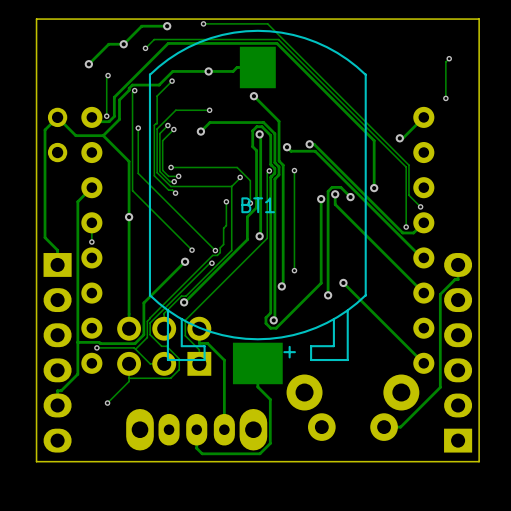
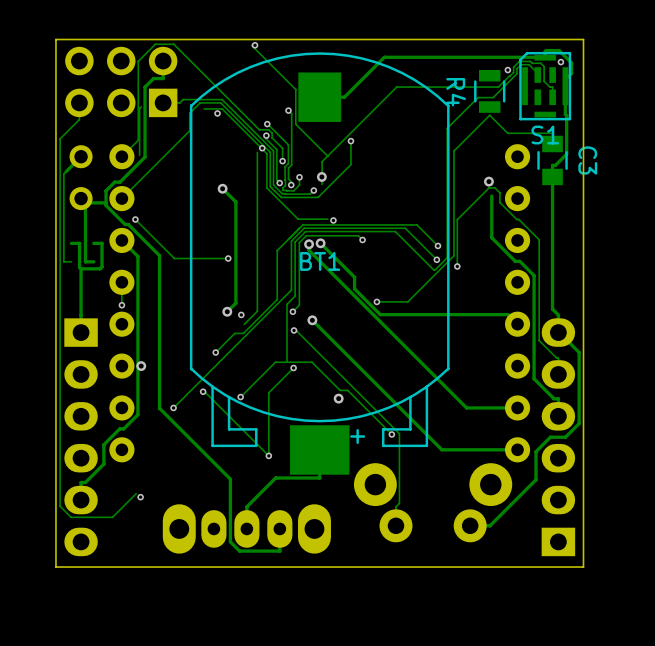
track: none -> (251, 45) (295, 89) (295, 124) (327, 156)
track: (203, 23) (267, 23) (408, 165) (408, 195) (420, 206) -> none
track: (167, 26) (141, 26) (123, 44) (108, 44) (88, 64) -> none
via: (167, 26) -> none
via: none -> (560, 62)
via: (123, 44) -> none
via: none -> (507, 70)
track: (145, 48) (154, 39) (278, 39) (406, 167) (406, 227) -> none
via: (145, 48) -> none
track: none -> (537, 75) (529, 64) (521, 64) (516, 68) (516, 73) (493, 97) (478, 97) (447, 128) (447, 257) (434, 270) (395, 231) (305, 231) (295, 242) (295, 296) (287, 304) (287, 362)
S1: none -> (545, 86)
track: (449, 58) (445, 62) (445, 98) -> none
via: (449, 58) -> none
R4: none -> (489, 91)
via: (88, 64) -> none
track: (257, 67) (237, 67) (233, 71) (172, 71) (159, 85) (132, 85) (119, 99) (119, 119) (103, 135) -> (319, 97) (344, 97) (384, 57) (545, 57) (546, 50) (559, 50) (571, 63) (571, 73) (565, 79) (566, 154) (555, 165) (552, 165) (552, 309) (558, 315) (558, 332)
track: none -> (552, 97) (552, 86) (549, 86) (544, 81) (544, 66) (540, 63) (530, 61) (519, 61) (513, 67) (513, 72) (498, 87) (396, 87) (322, 161) (322, 184)
via: (208, 71) -> none
track: none -> (79, 102) (79, 119) (60, 138) (60, 506) (71, 517) (112, 517) (136, 493)
track: none -> (163, 102) (179, 102) (183, 99) (222, 99) (273, 150) (273, 185) (282, 193) (310, 194) (313, 190)
via: (108, 75) -> none
track: none -> (204, 108) (222, 108) (266, 153) (266, 187) (298, 219) (327, 219)
track: none -> (288, 110) (291, 113) (291, 164) (288, 168) (288, 179) (291, 185)
via: none -> (288, 110)
track: (172, 81) (157, 96) (157, 123) (154, 125) (154, 175) (168, 190) (172, 190) (175, 193) -> none
track: (134, 90) (132, 92) (132, 190) (192, 250) -> none
via: (134, 90) -> none
track: none -> (267, 124) (288, 144) (288, 163) (285, 166) (285, 185) (283, 189) (293, 190) (299, 185) (299, 177)
via: none -> (267, 124)
track: (253, 96) (279, 121) (279, 161) (283, 165) (281, 286) -> none
via: (253, 96) -> none
via: (445, 98) -> none
track: none -> (266, 135) (266, 139) (276, 149) (276, 180) (279, 183)
via: none -> (266, 135)
track: none -> (350, 141) (350, 164) (318, 197) (281, 197) (275, 191)
via: none -> (350, 141)
track: none -> (552, 143) (552, 133) (507, 133) (489, 115) (454, 151) (454, 255) (407, 301) (376, 301)
track: (209, 110) (175, 110) (157, 128) (157, 172) (170, 186) (231, 186) (231, 250) (186, 296) (181, 296) (164, 313) (164, 328) -> none
track: none -> (257, 152) (257, 311) (244, 324)
via: (106, 116) -> none
track: (57, 117) (75, 135) (103, 135) -> none
track: (91, 117) (96, 121) (109, 121) (114, 116) (114, 97) (168, 43) (276, 43) (374, 140) (374, 188) -> (121, 156) (138, 140) (138, 61) (155, 44) (173, 44) (259, 129) (268, 129) (272, 133) (272, 137) (282, 148) (282, 161)
track: (423, 117) (402, 138) (399, 138) -> none
C3: none -> (552, 160)
via: none -> (282, 161)
track: (167, 125) (159, 133) (159, 171) (170, 181) (174, 181) -> none
via: (167, 125) -> none
track: (138, 128) (138, 173) (215, 250) -> none
via: (138, 128) -> none
track: (45, 129) (45, 237) (57, 250) -> (66, 171) (63, 173) (63, 261) (71, 261)
track: (173, 129) (162, 140) (162, 170) (168, 176) (178, 176) -> none
via: (173, 129) -> none
track: (200, 131) (209, 122) (263, 122) (274, 133) (274, 162) (279, 166) (279, 174) (274, 179) (273, 320) -> none
via position: (200, 131) -> (222, 188)
via: none -> (299, 177)
track: (259, 134) (259, 236) -> none
track: (103, 135) (129, 161) (129, 328) -> none
via: none -> (279, 183)
via: none -> (291, 185)
track: none -> (271, 187) (270, 152) (220, 102) (200, 102) (189, 113) (189, 130) (121, 198)
track: none -> (271, 187) (274, 191)
track: none -> (222, 188) (235, 202) (235, 303) (227, 311)
track: (309, 144) (314, 144) (402, 232) (413, 232) (423, 222) -> none
via: (309, 144) -> none
via: none -> (313, 190)
track: (287, 147) (291, 151) (315, 151) (423, 257) -> (320, 243) (354, 277) (354, 288) (380, 314) (507, 314) (517, 324)
via: (287, 147) -> none
track: none -> (491, 196) (491, 237) (515, 261) (519, 261) (534, 275) (534, 378) (554, 398) (558, 398) (558, 416)
track: none -> (81, 198) (85, 202) (106, 202)
track: none -> (85, 202) (85, 261) (93, 261)
track: (271, 165) (274, 168) (274, 173) (271, 176) -> none
track: (271, 165) (270, 135) (261, 126) (256, 126) (252, 130) (252, 146) (256, 150) (256, 207) (247, 216) (247, 239) (184, 302) -> none
track: (171, 167) (237, 167) (250, 180) (250, 203) -> none
via: (171, 167) -> none
track: none -> (135, 219) (174, 258) (228, 258)
via: none -> (135, 219)
track: (269, 170) (267, 172) (267, 238) (185, 320) (185, 335) (199, 349) (199, 363) -> none
track: (294, 170) (294, 270) -> none
via position: (294, 170) -> (362, 239)
via: (178, 176) -> none
track: (271, 176) (270, 312) (265, 317) (265, 323) (270, 328) (276, 328) (321, 283) (321, 199) -> none
via: (240, 177) -> none
via: (174, 181) -> none
track: (91, 187) (77, 201) (76, 375) -> (121, 240) (137, 256) (137, 414) (103, 444) (103, 464)
track: none -> (362, 239) (358, 235) (306, 235) (299, 242) (299, 305) (292, 311)
via: (374, 188) -> none
track: none -> (71, 243) (79, 243) (81, 268)
track: none -> (93, 243) (101, 243) (101, 266) (100, 268) (81, 268)
track: none -> (309, 244) (309, 250) (466, 407) (517, 407)
via: none -> (309, 244)
via: none -> (320, 243)
track: none -> (437, 245) (417, 224) (302, 224) (277, 250) (277, 299) (243, 333) (234, 333) (215, 352)
via: none -> (437, 245)
via: (175, 193) -> none
track: (335, 194) (335, 204) (423, 293) -> none
via: (335, 194) -> none
track: (350, 197) (340, 187) (332, 187) (328, 191) (328, 295) -> none
via: (350, 197) -> none
via: (321, 199) -> none
track: (226, 201) (226, 225) (223, 228) (223, 244) (220, 247) (220, 252) (217, 255) (212, 255) (150, 317) (147, 321) (147, 337) (135, 349) -> none
via: (226, 201) -> none
via: none -> (228, 258)
via: (250, 203) -> none
track: none -> (436, 259) (405, 228) (304, 228) (291, 241) (291, 290) (173, 407)
via: none -> (436, 259)
via: (420, 206) -> none
track: none -> (457, 266) (457, 219) (489, 187) (495, 187) (499, 192) (499, 202) (539, 239) (539, 340) (558, 357) (558, 374)
via: none -> (457, 266)
track: none -> (81, 268) (81, 315)
via: (129, 217) -> none
via: (406, 227) -> none
via position: (259, 236) -> (312, 320)
via: none -> (376, 301)
via: none -> (292, 311)
via: (215, 250) -> none
track: (185, 261) (143, 302) (143, 334) (135, 343) (77, 342) -> none
via position: (185, 261) -> (227, 311)
track: (211, 263) (150, 322) (150, 334) (161, 346) (166, 346) (179, 358) (179, 369) (170, 378) (129, 378) -> none
via: (211, 263) -> none
track: none -> (294, 330) (399, 433) (399, 503) (396, 506) (396, 525)
via: none -> (294, 330)
track: (458, 264) (458, 279) (455, 279) (440, 294) (439, 388) -> (558, 331) (579, 352) (579, 423) (565, 437) (550, 437) (536, 451) (536, 479)
via: (294, 270) -> none
via: none -> (215, 352)
track: (343, 282) (423, 363) -> (312, 320) (441, 449) (517, 449)
via: (343, 282) -> none
via: (281, 286) -> none
via: none -> (141, 366)
track: none -> (293, 368) (268, 392) (268, 455) (203, 391)
via: none -> (293, 368)
via: (328, 295) -> none
via: (184, 302) -> none
via: none -> (203, 391)
track: none -> (240, 397) (275, 362) (311, 362) (340, 390) (347, 390) (391, 434)
via: none -> (240, 397)
via: none -> (173, 407)
track: (199, 328) (199, 343) (207, 343) (224, 360) (224, 429) -> (163, 61) (163, 78) (153, 78) (145, 87) (145, 157) (119, 182) (114, 182) (106, 190) (106, 205) (159, 255) (159, 408) (230, 479) (230, 541) (239, 551) (279, 551) (279, 528)
part position: (164, 346) -> (121, 81)
track: (96, 347) (134, 347) (150, 363) (164, 363) -> none
via: (96, 347) -> none
via: none -> (391, 434)
track: (129, 363) (129, 381) (107, 403) -> none
via: none -> (268, 455)
track: (257, 386) (270, 399) (270, 443) (259, 453) (202, 453) (196, 448) (196, 429) -> (319, 478) (275, 478) (246, 506) (246, 528)

